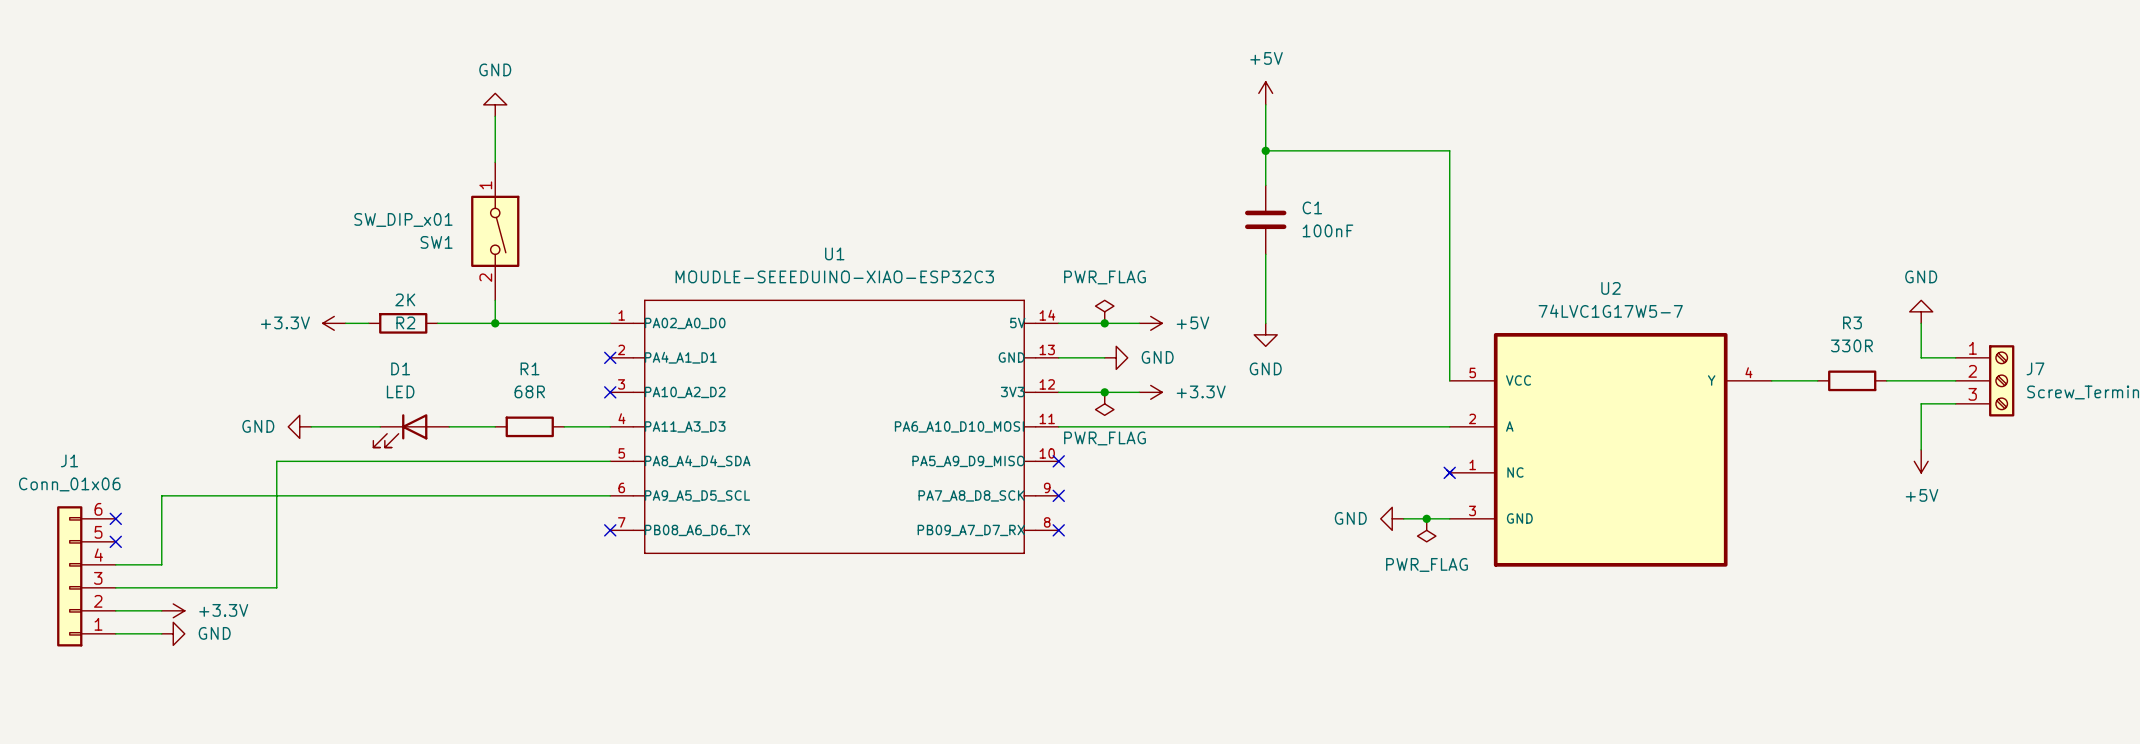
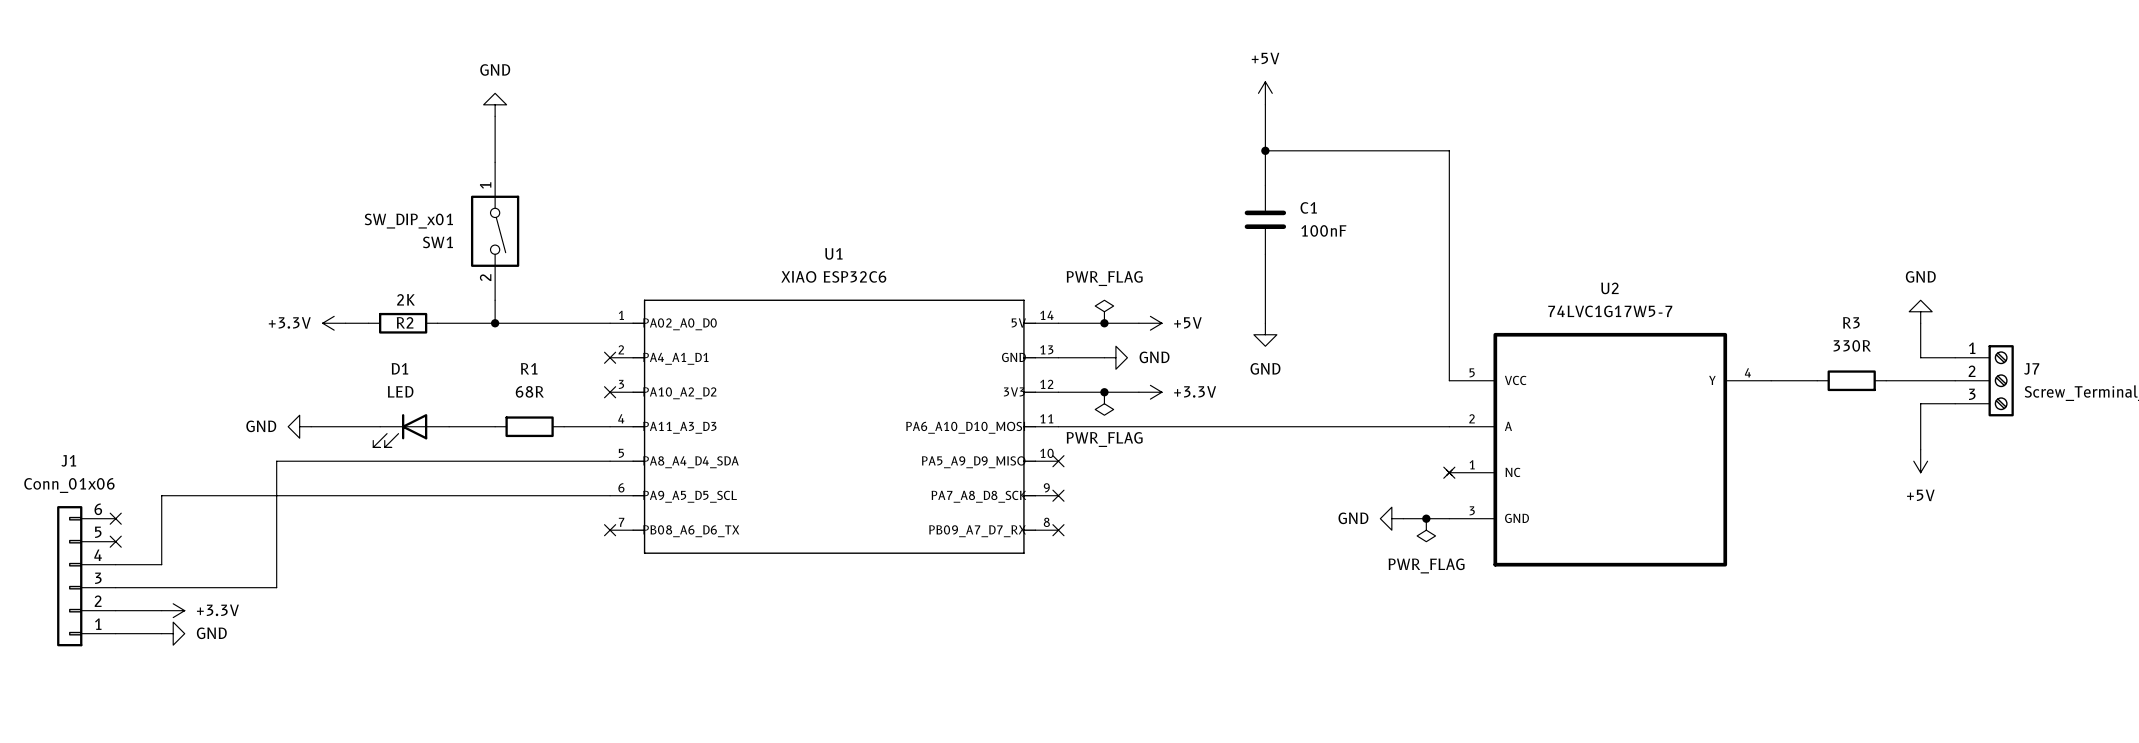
U1 value: MOUDLE-SEEEDUINO-XIAO-ESP32C3 (834, 276) -> XIAO ESP32C6 (833, 276)

